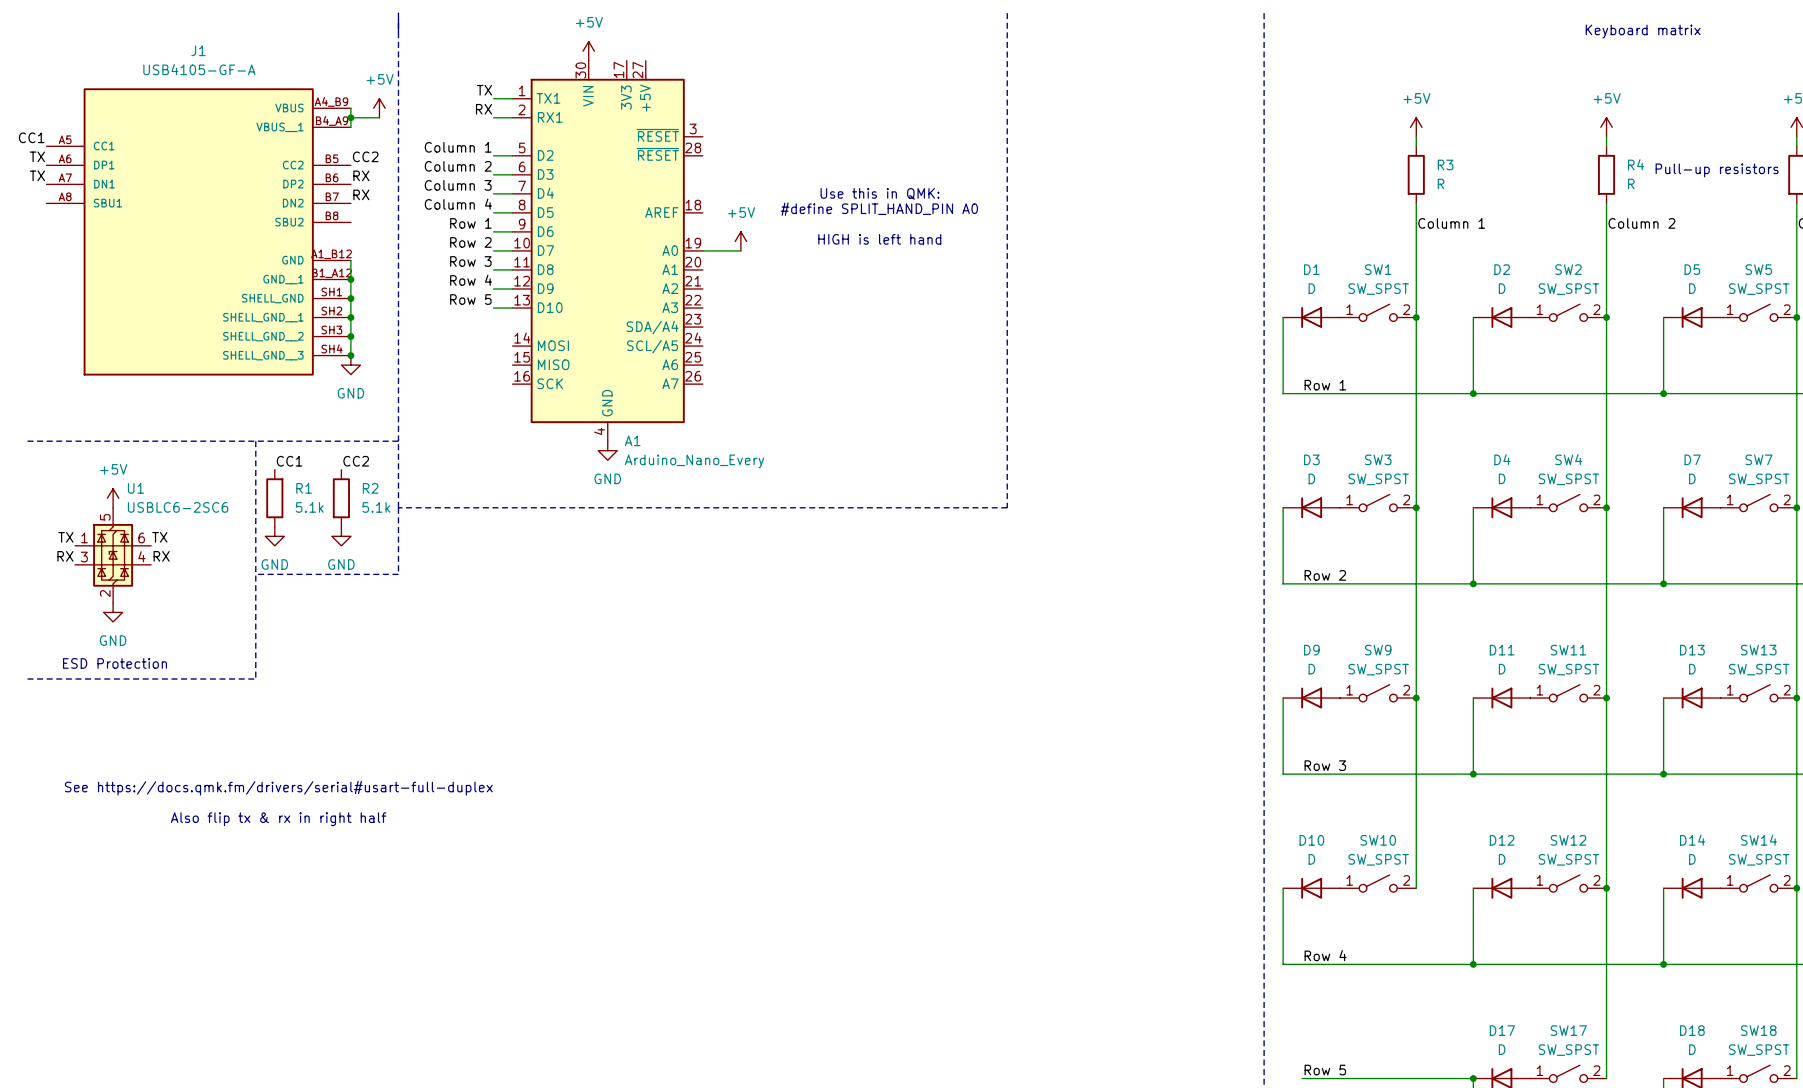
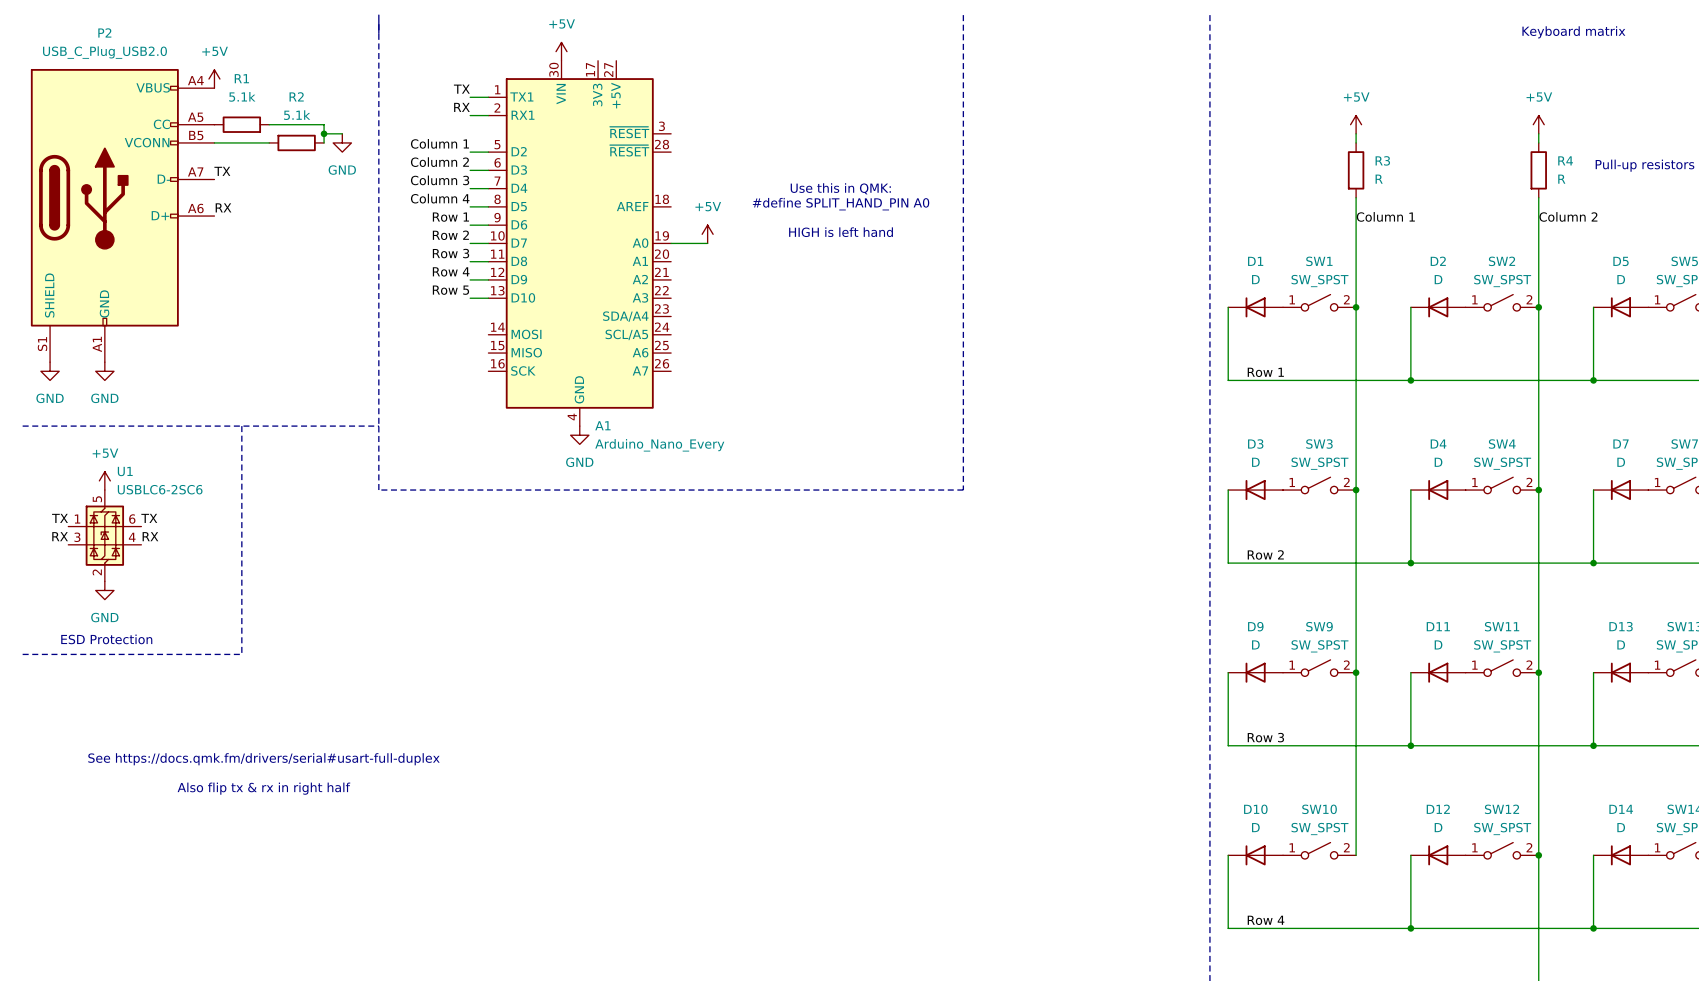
wire: (350, 108) (350, 127) -> none
power symbol position: +5V (379, 108) -> +5V (214, 79)
wire: (350, 117) (379, 117) -> none
junction position: (350, 117) -> (324, 133)
wire: none -> (324, 133) (342, 133)
label: CC1 (31, 137) -> none
power symbol: none -> GND (342, 142)
label: TX (37, 156) -> none
label: CC2 (365, 156) -> none
label: TX (37, 175) -> none
label: none -> TX (222, 171)
label: RX (361, 175) -> none
label: RX (361, 194) -> none
label: none -> RX (223, 207)
P2: none -> USB_C_Plug_USB2.0 (122, 215)
J1: USB4105-GF-A (198, 231) -> none
wire: (350, 260) (350, 355) -> none
junction: (350, 279) -> none
junction: (350, 298) -> none
junction: (350, 317) -> none
junction: (350, 336) -> none
junction: (350, 355) -> none
power symbol: GND (350, 365) -> none
power symbol: none -> GND (50, 371)
power symbol: none -> GND (104, 371)
label: CC1 (289, 461) -> none
label: CC2 (356, 461) -> none
R1 name position: R1 (304, 488) -> R1 (241, 78)
R2 name position: R2 (370, 488) -> R2 (296, 96)
R1 rotation: 0° (274, 498) -> 90° clockwise (241, 124)
R1 position: (274, 498) -> (241, 124)
R2 rotation: 0° (341, 498) -> 90° clockwise (296, 142)
R2 position: (341, 498) -> (296, 142)
R1 value position: 5.1k (309, 507) -> 5.1k (242, 96)
R2 value position: 5.1k (376, 507) -> 5.1k (297, 115)
line: (398, 507) (398, 574) (255, 574) -> none
power symbol: GND (274, 536) -> none
power symbol: GND (341, 536) -> none

